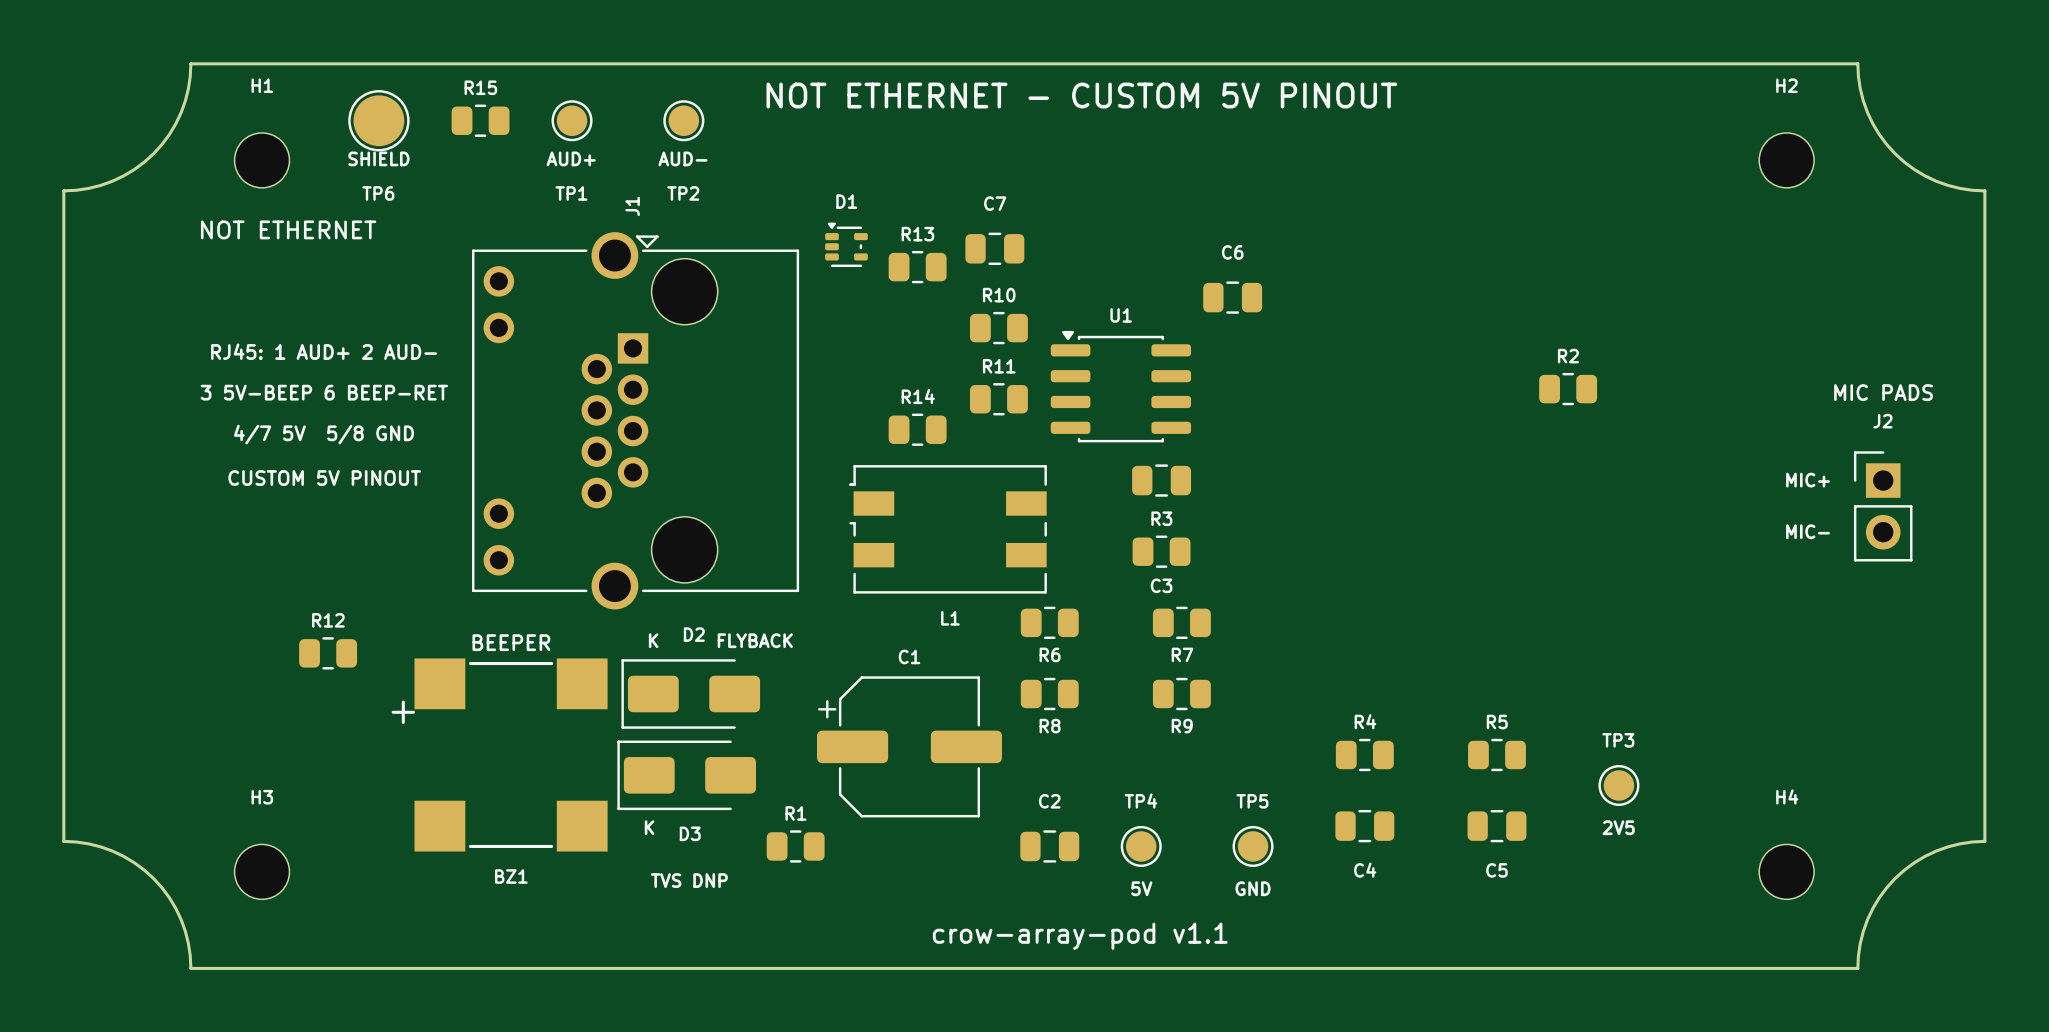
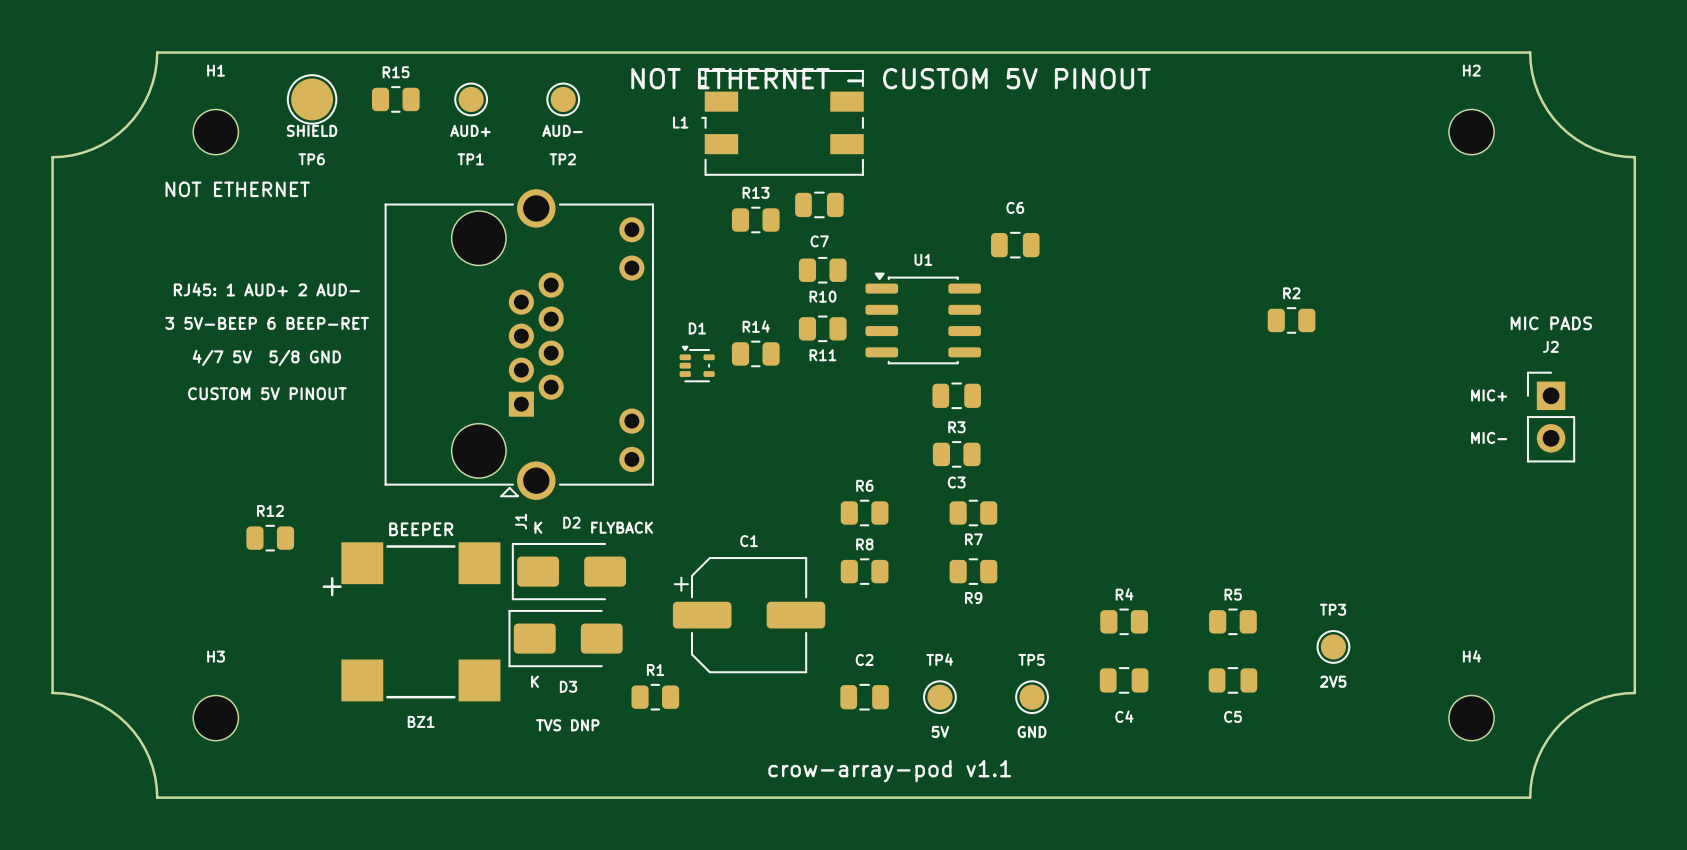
C7 name position: C7 (995, 203) -> C7 (819, 241)
D1 position: (846, 244) -> (697, 364)
R10 name position: R10 (999, 295) -> R10 (822, 296)
R11 name position: R11 (999, 366) -> R11 (822, 355)
J1 rotation: 0° (635, 420) -> 180° (519, 344)
L1 position: (948, 529) -> (782, 122)
L1 name position: L1 (950, 618) -> L1 (680, 122)
R6 name position: R6 (1050, 654) -> R6 (864, 485)
R8 name position: R8 (1050, 726) -> R8 (864, 544)

